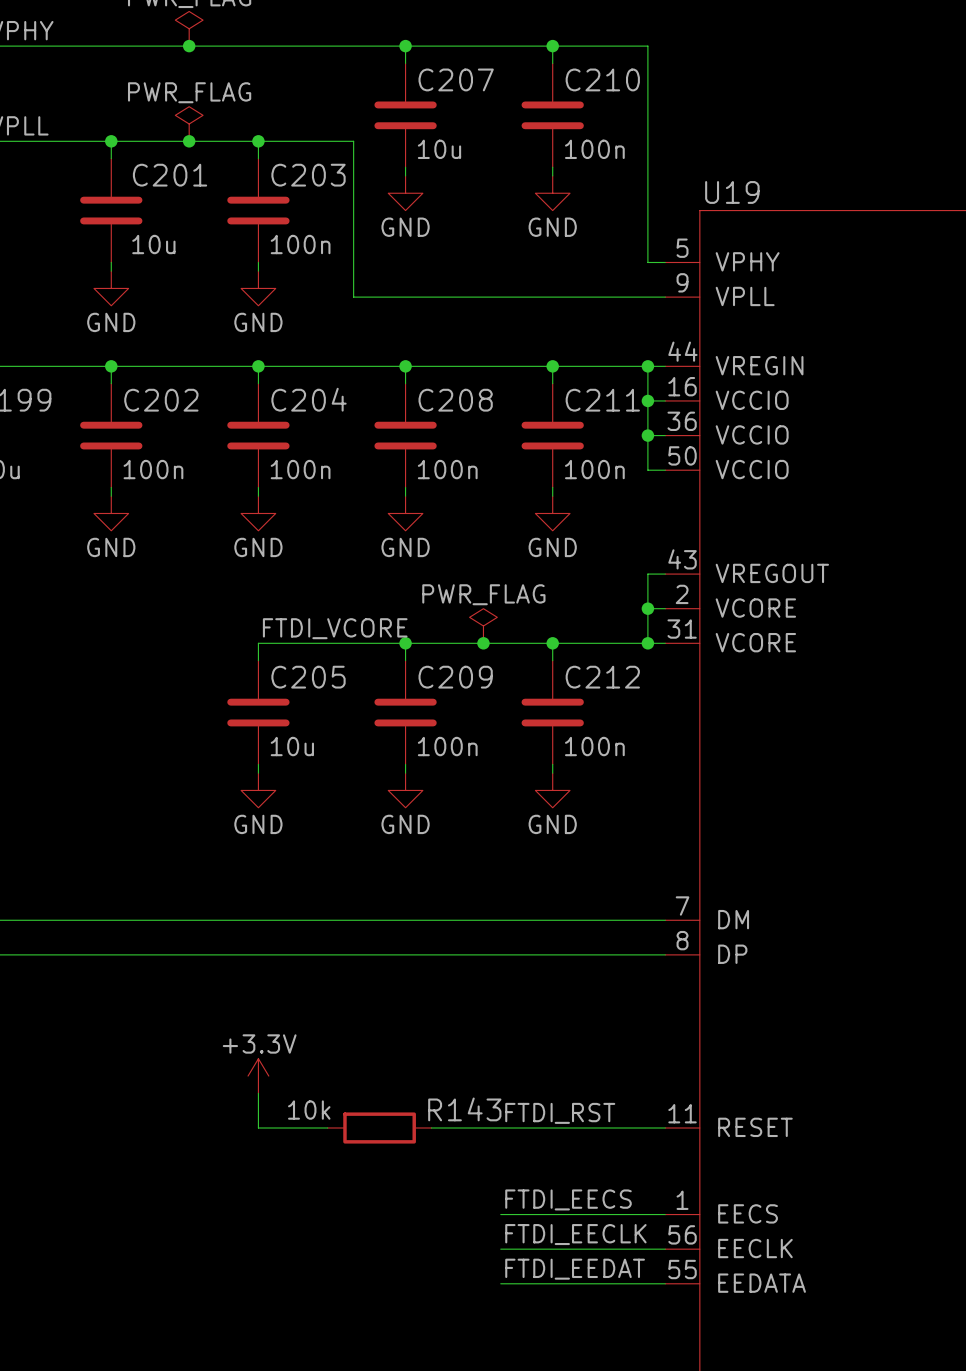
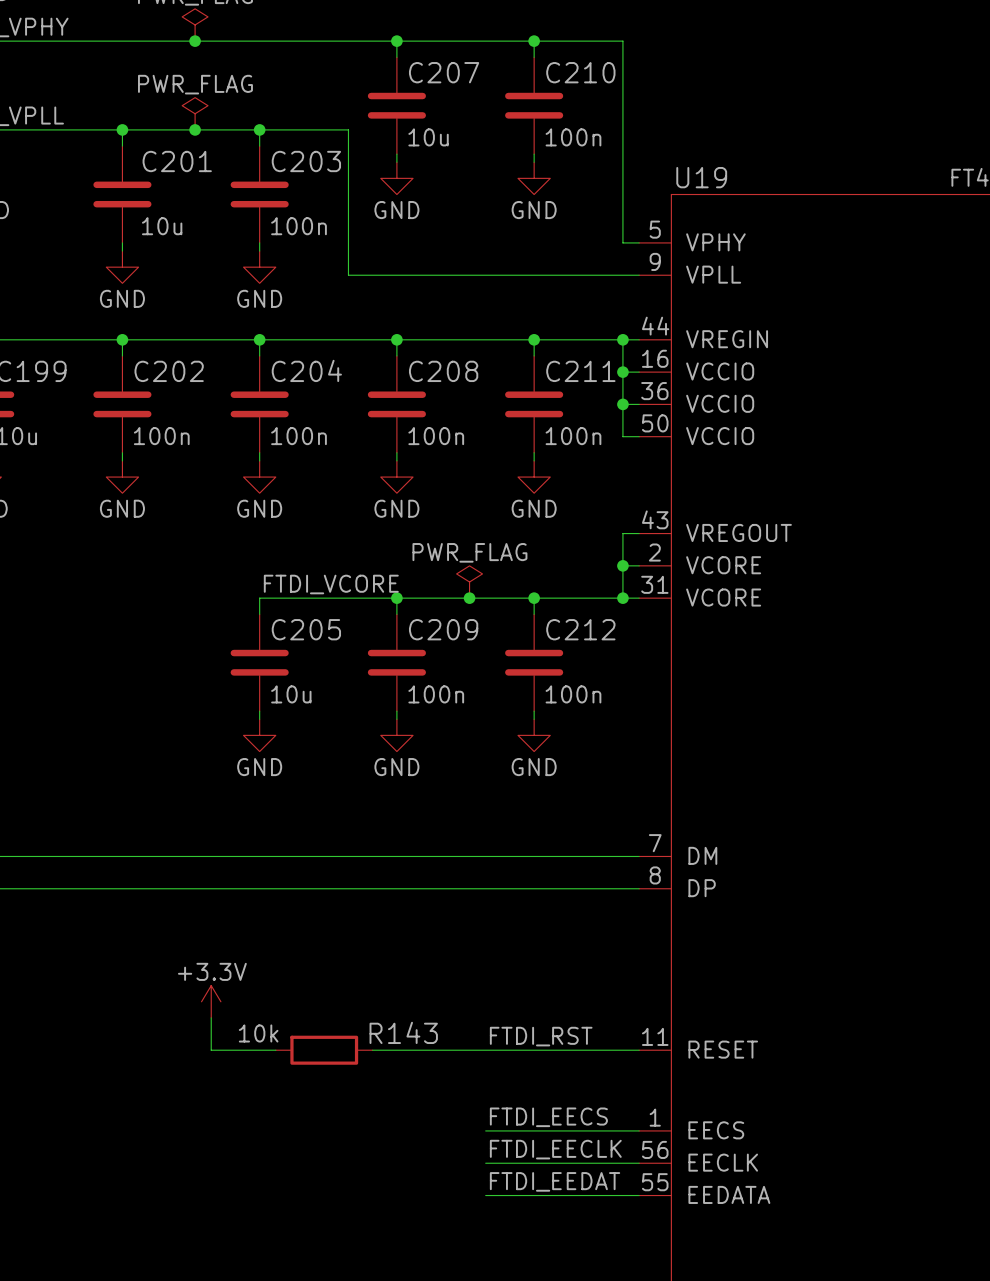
power symbol position: +3.3V (258, 1076) -> +3.3V (211, 1001)
wire: (258, 1093) (258, 1128) -> (211, 1017) (211, 1050) (259, 1050)
wire: (275, 1128) (327, 1128) -> (372, 1050) (421, 1050)
R143 position: (379, 1128) -> (324, 1050)

